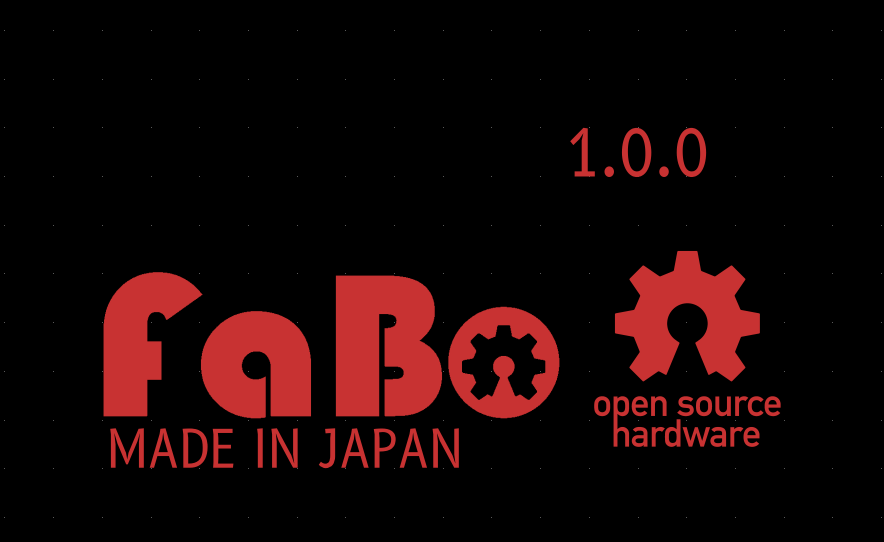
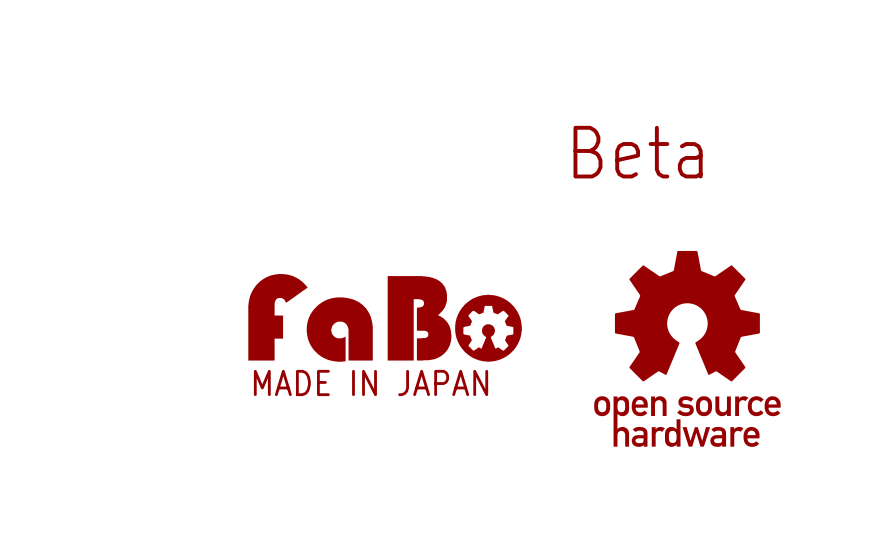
text: 1.0.0 (638, 152) -> Beta (638, 152)
part: none -> (385, 317)
part: (331, 345) -> none

